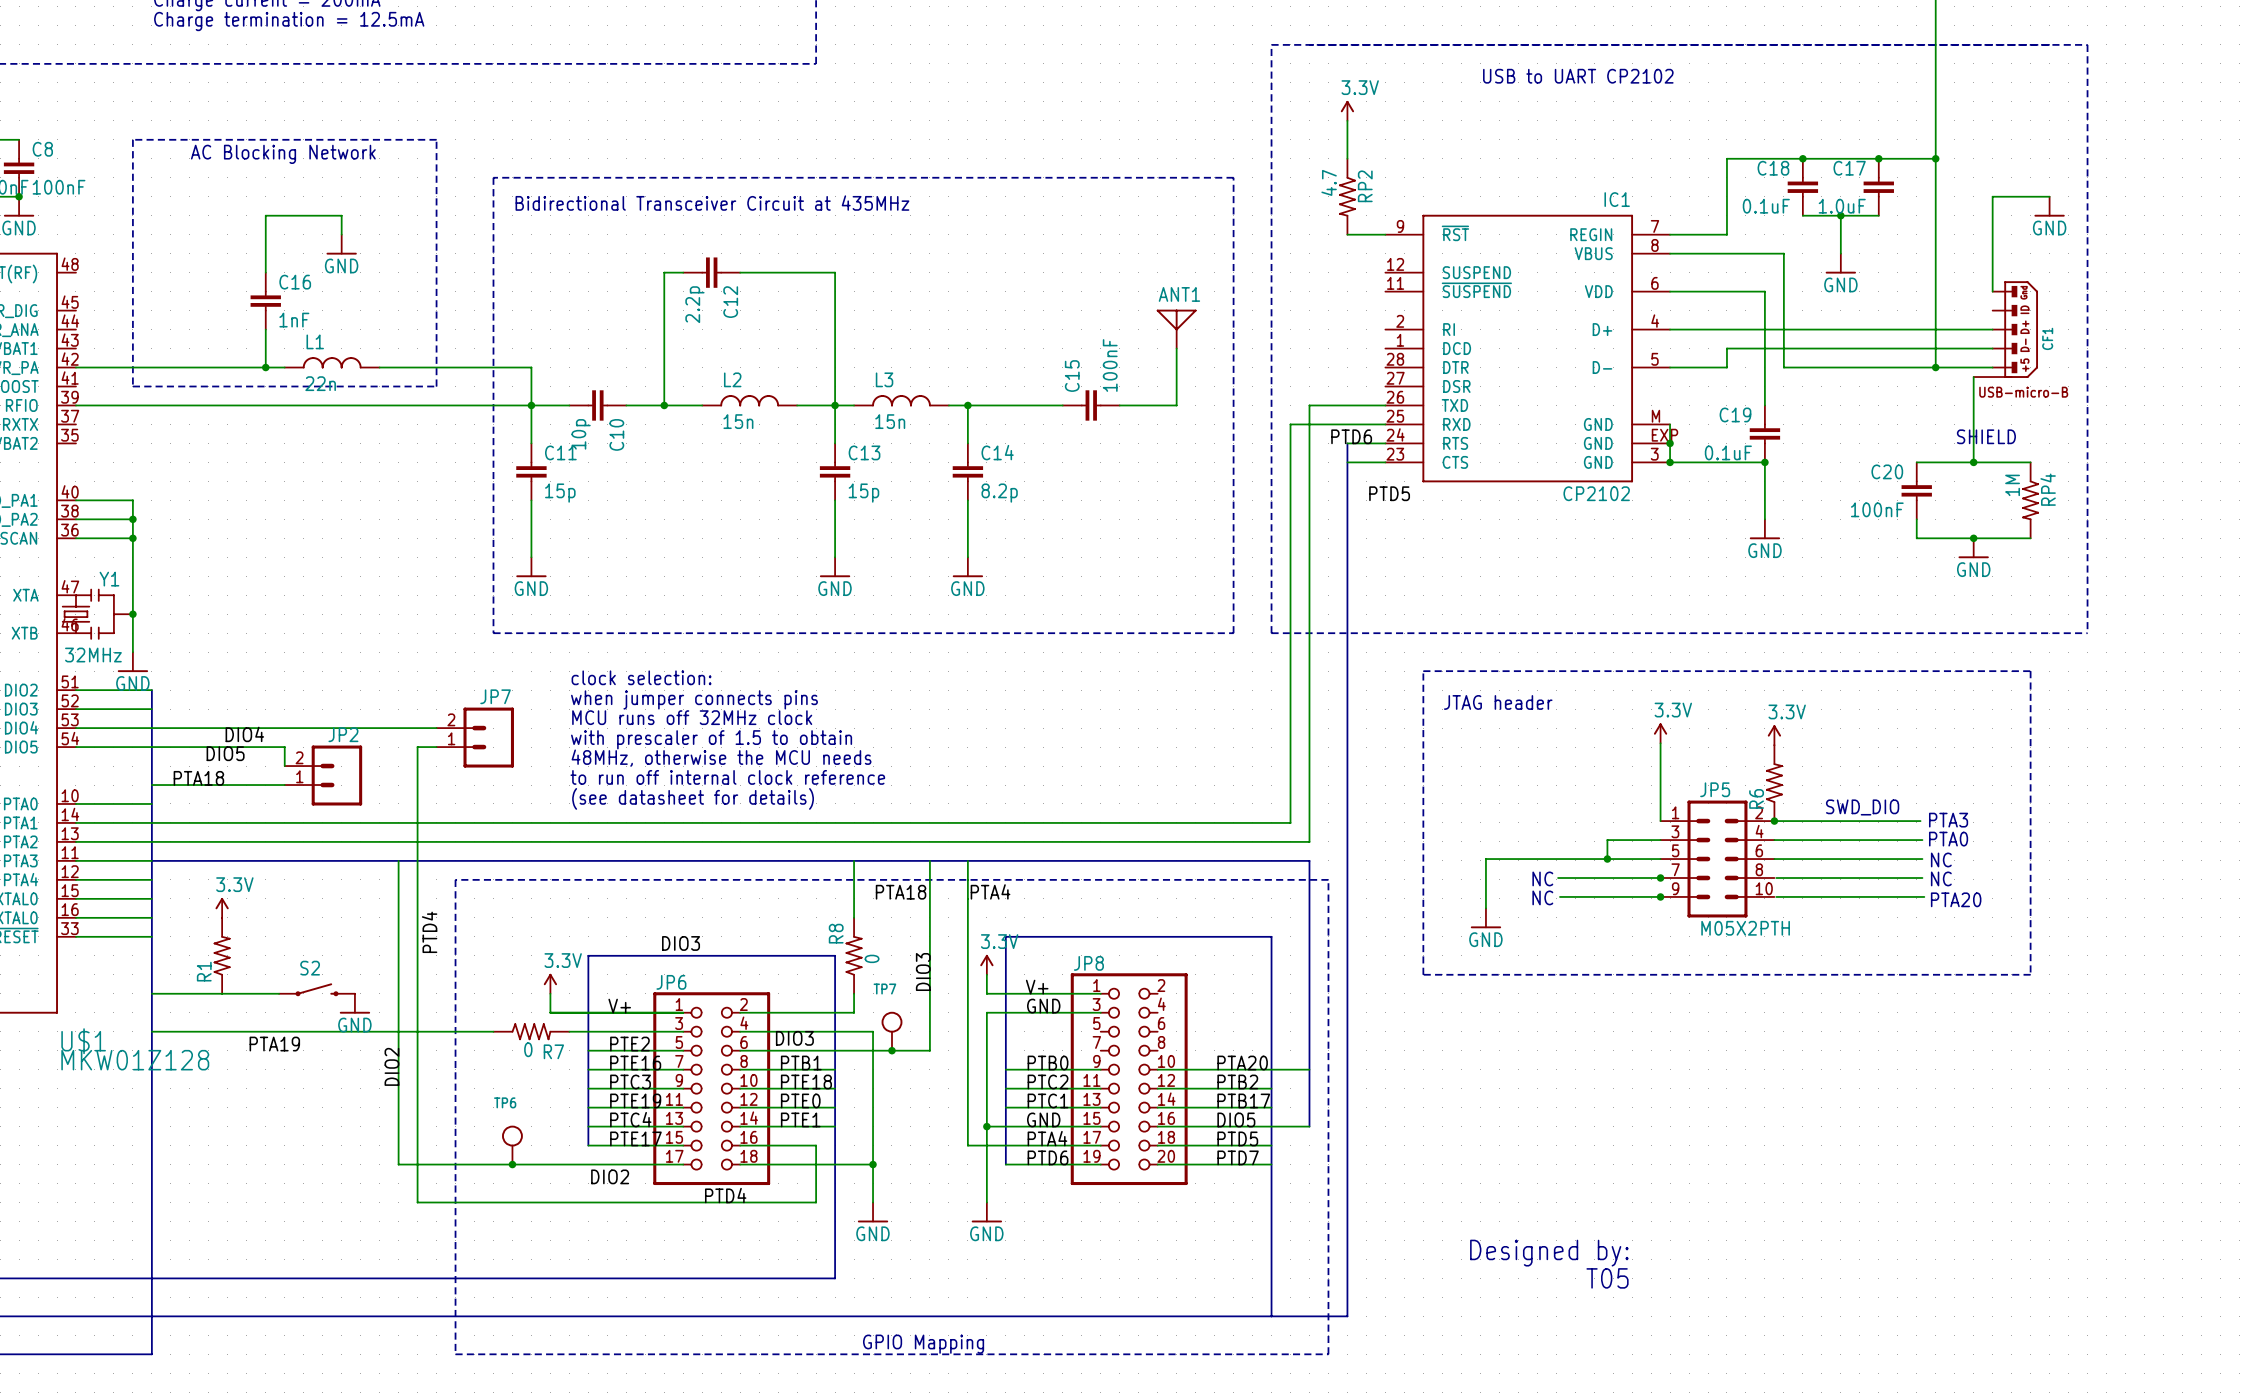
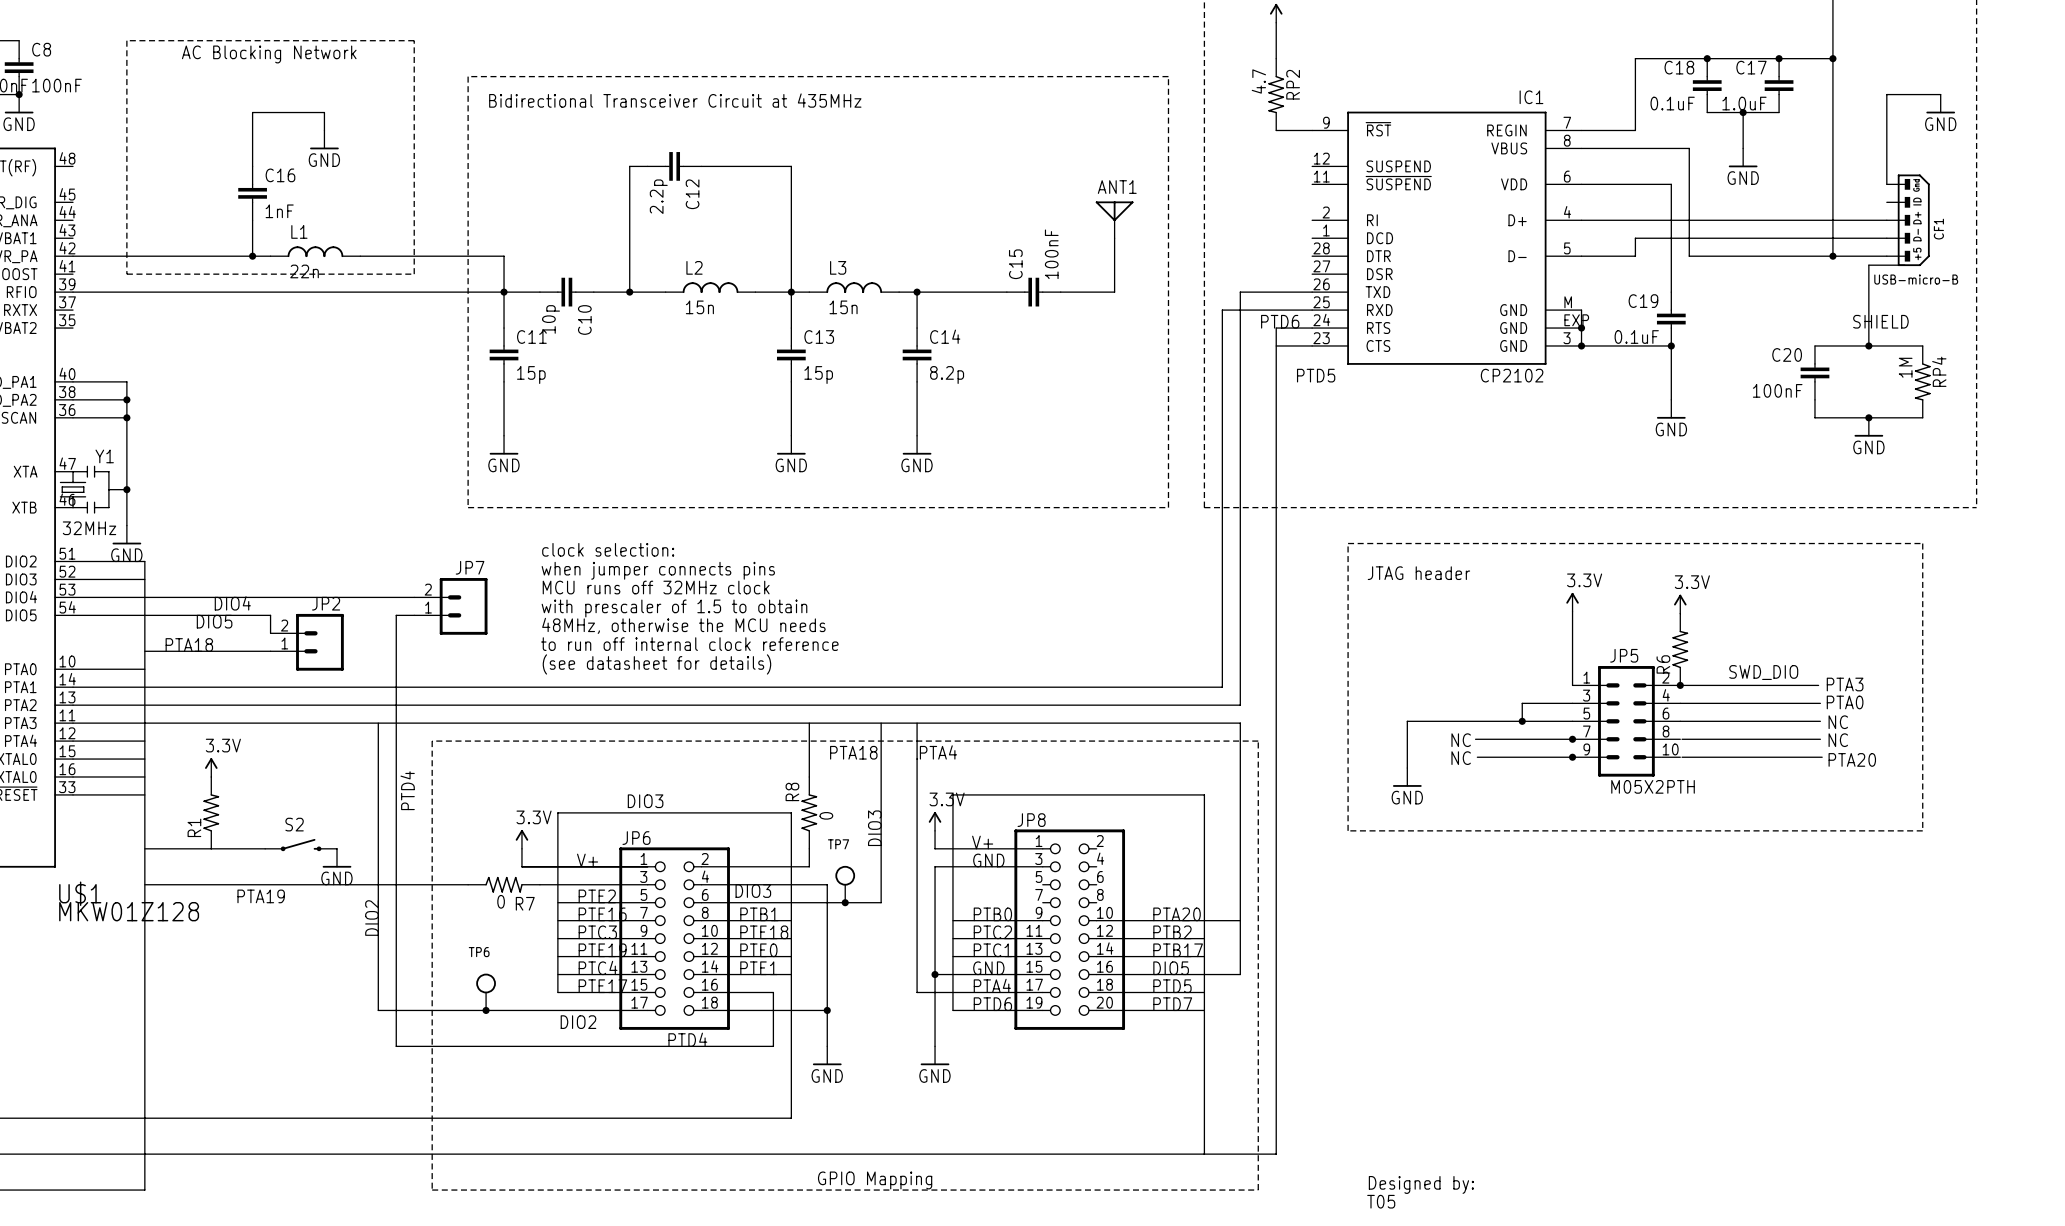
text: Designed by: (1549, 1253) -> none
text: T05 (1607, 1278) -> none
text: none -> Designed by: (1421, 1184)
text: none -> T05 (1381, 1201)

